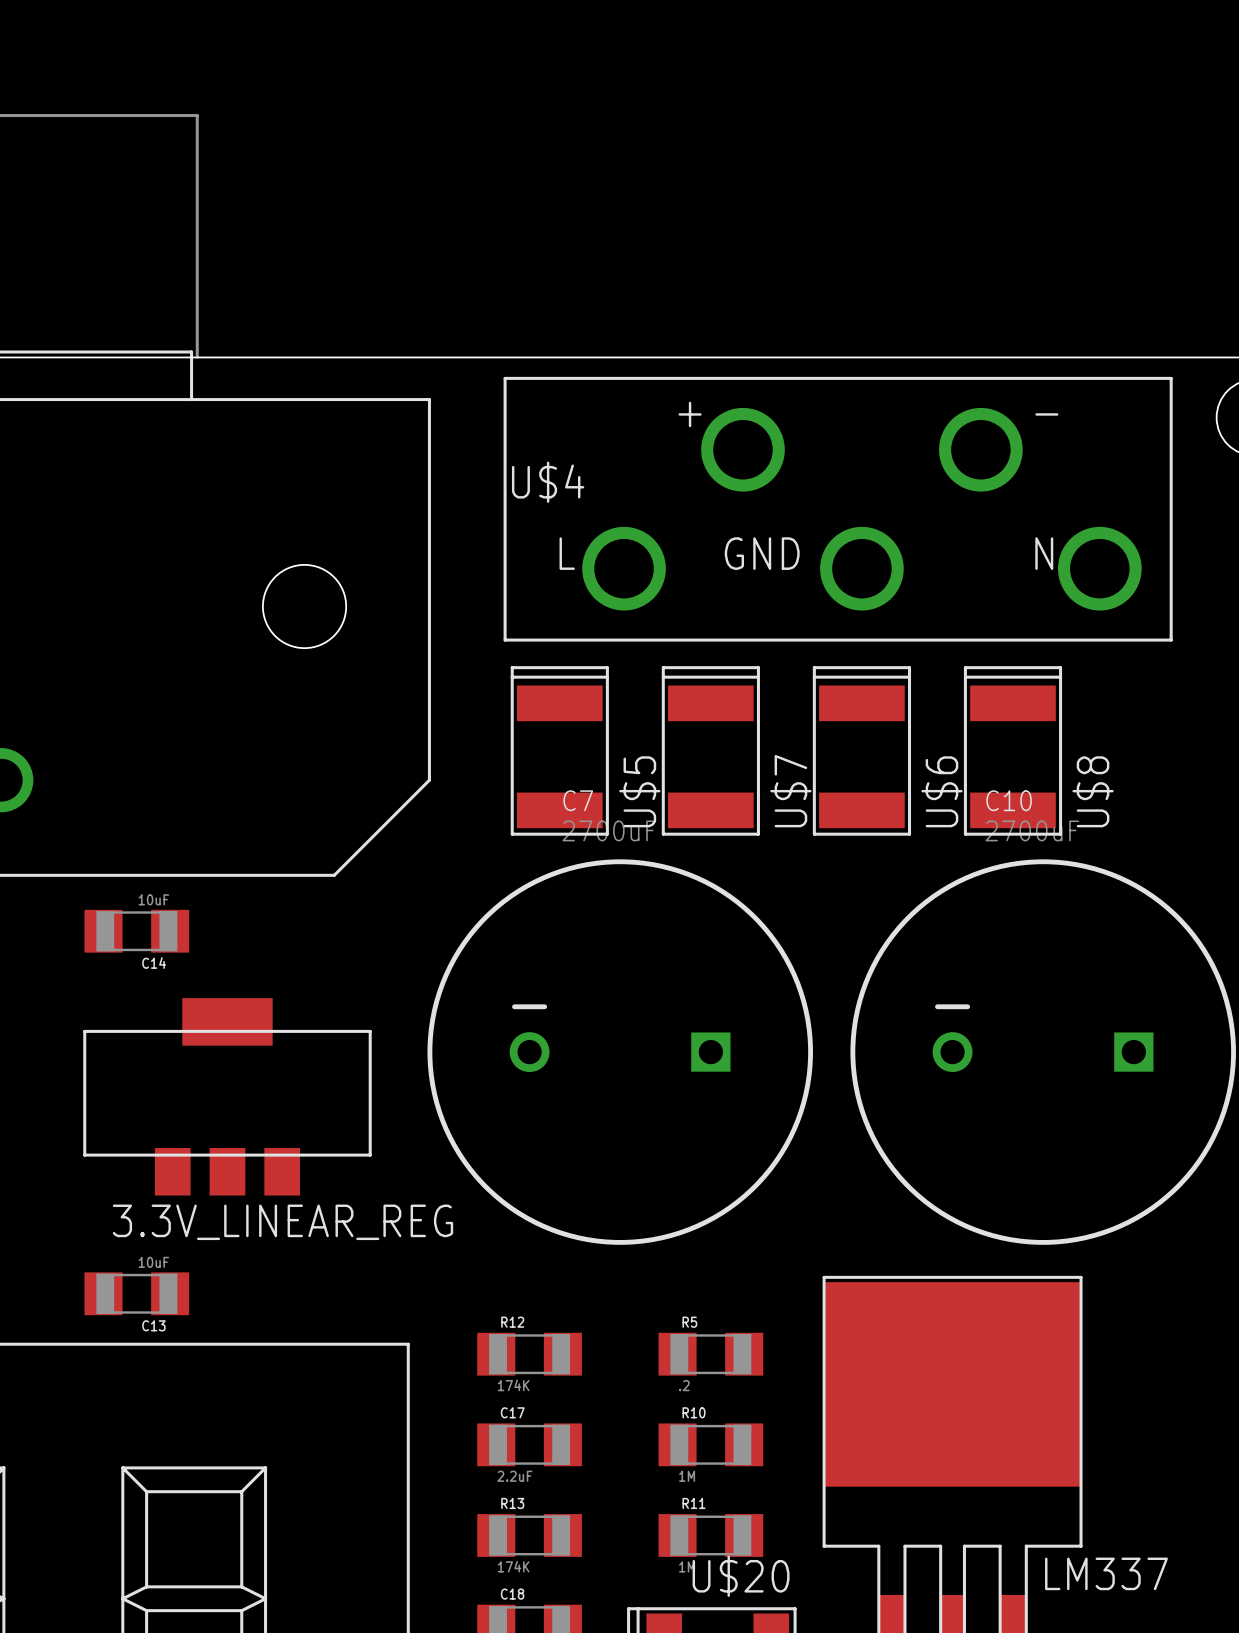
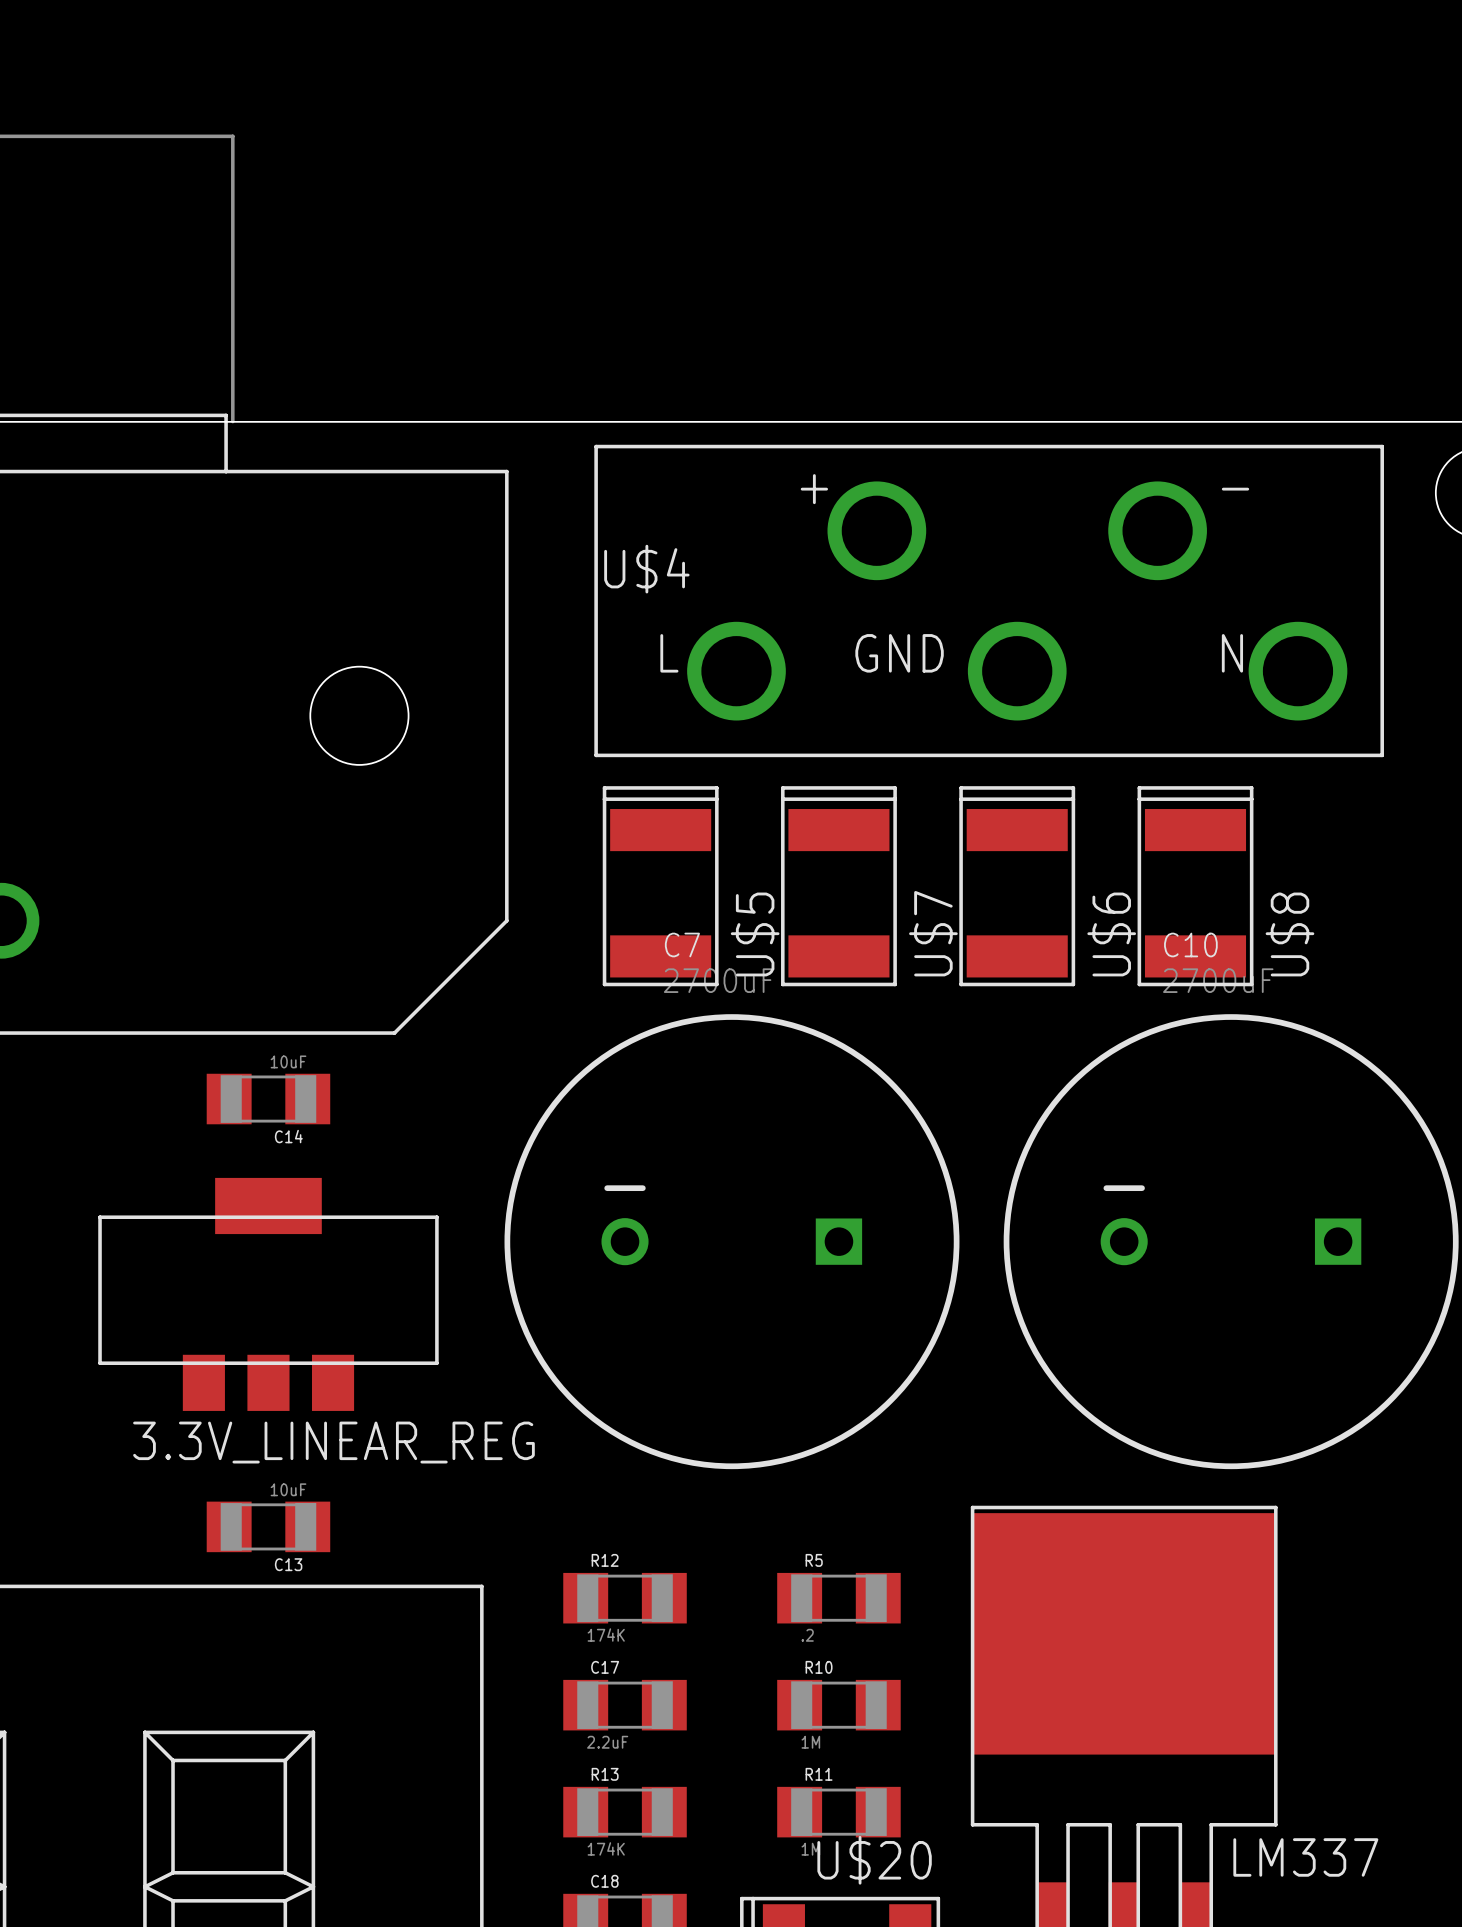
C14 position: (136, 931) -> (268, 1099)
C13 position: (136, 1293) -> (268, 1526)

